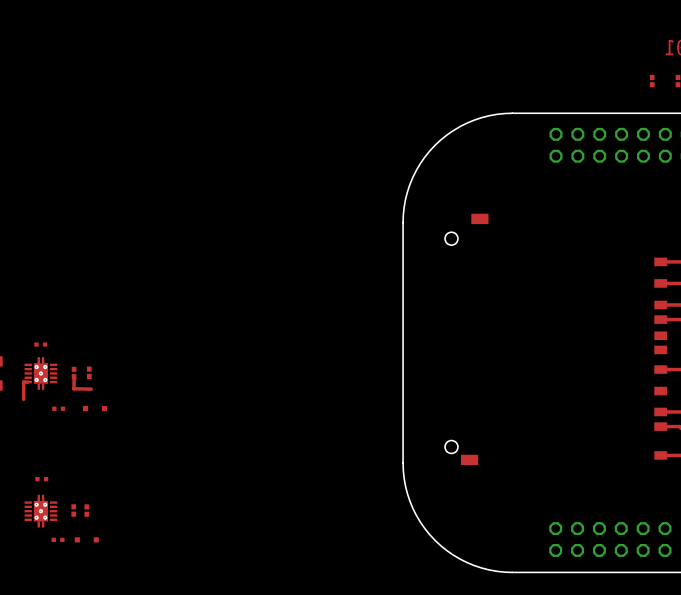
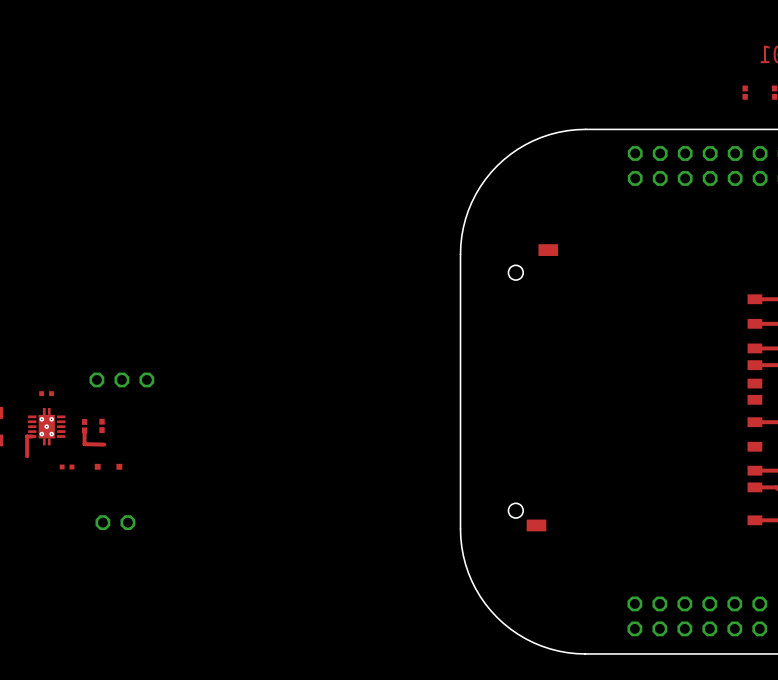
part: none -> (121, 379)
part: none -> (115, 522)
part: (41, 479) -> none
part: (73, 510) -> none
part: (86, 510) -> none
part: (40, 511) -> none
part: (58, 539) -> none
part: (86, 539) -> none

